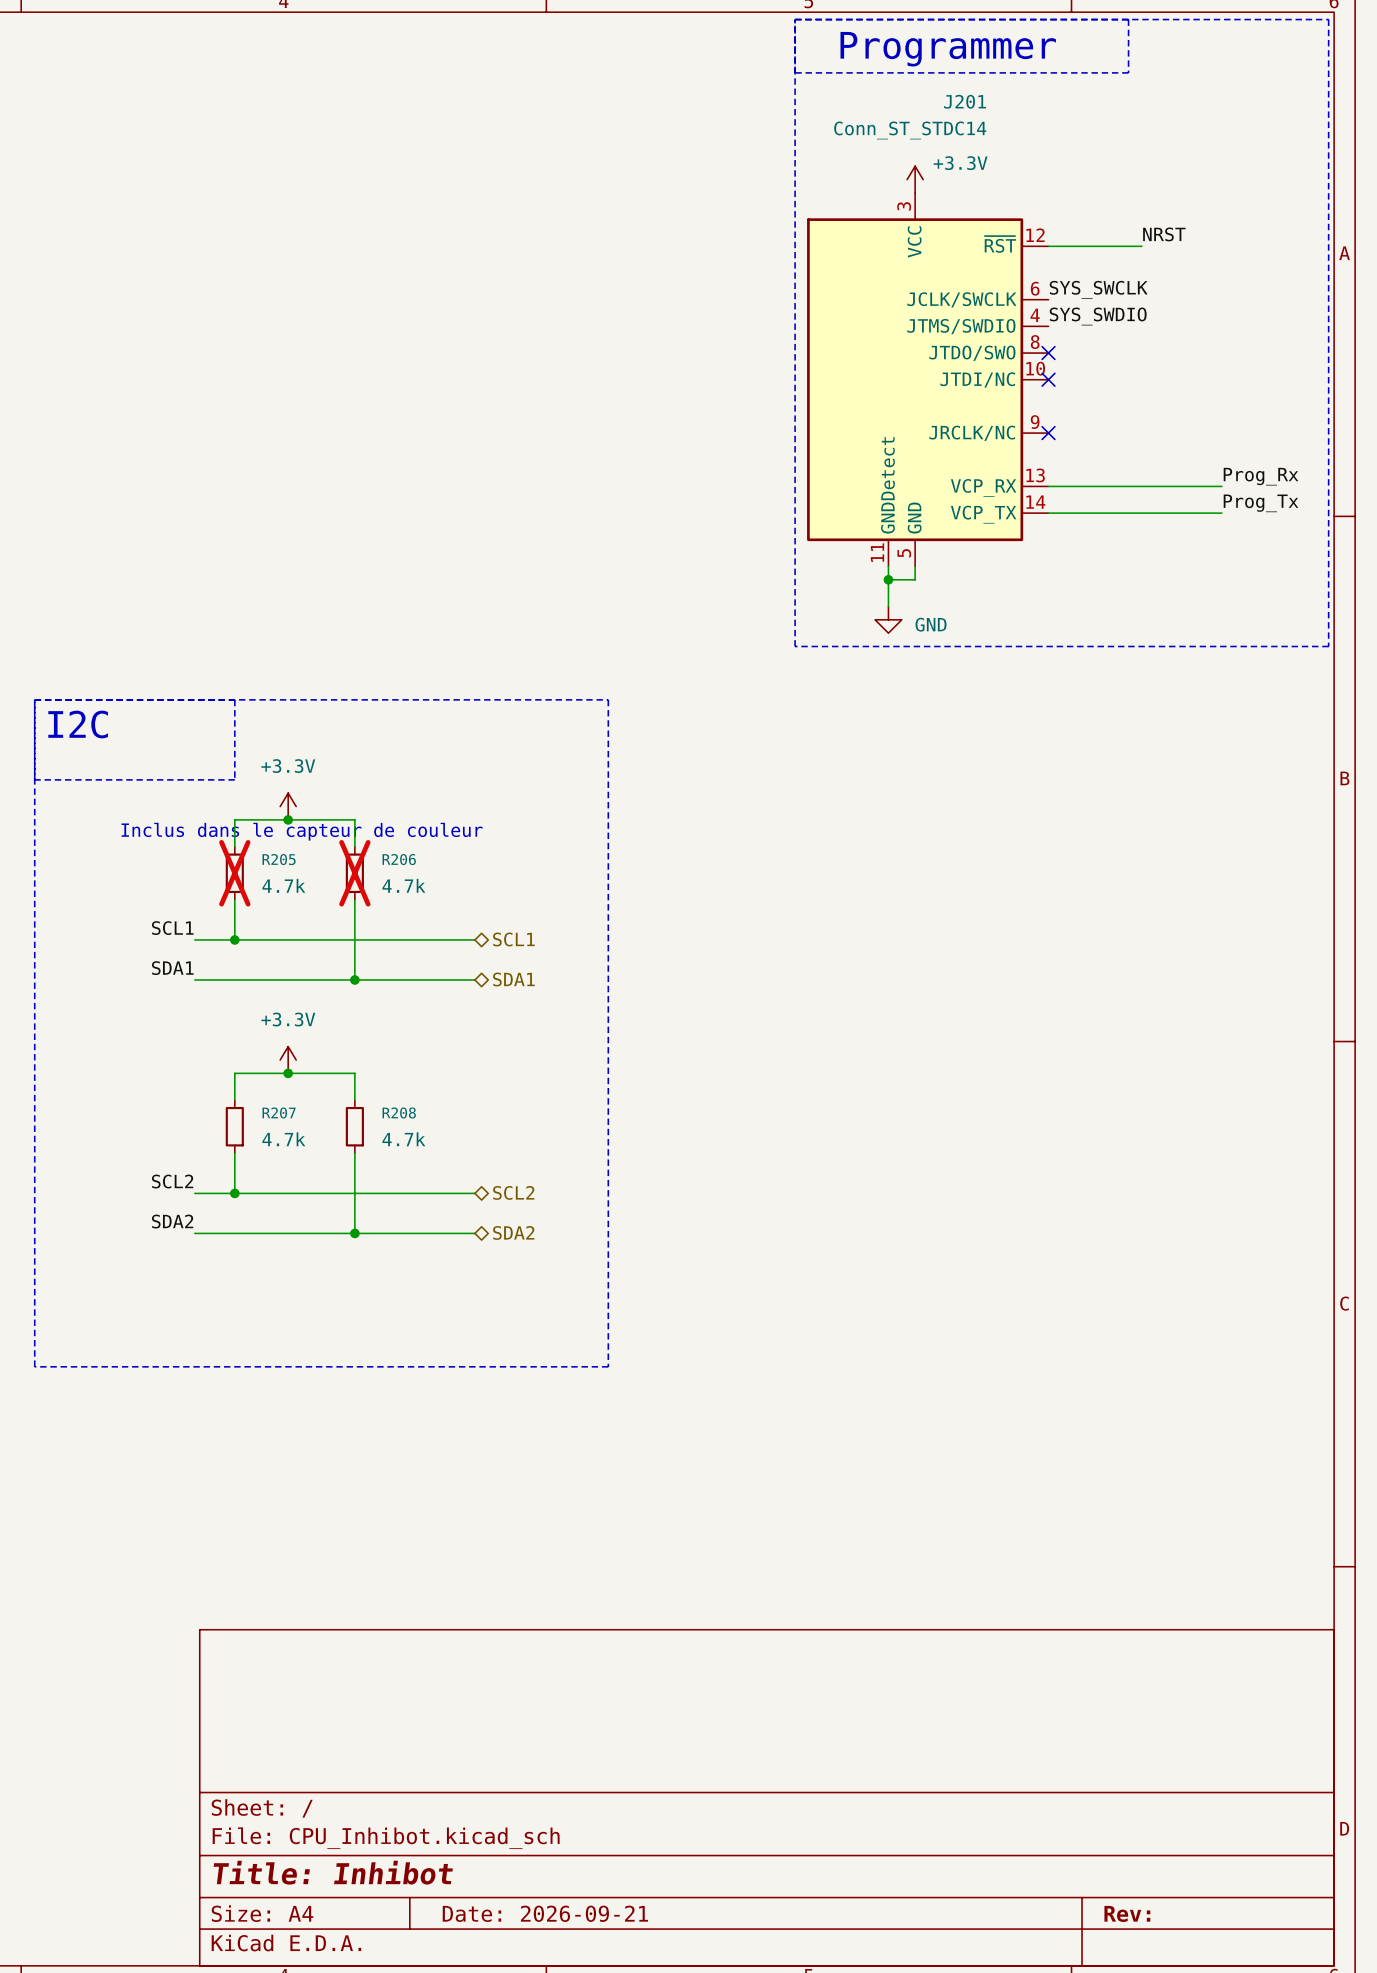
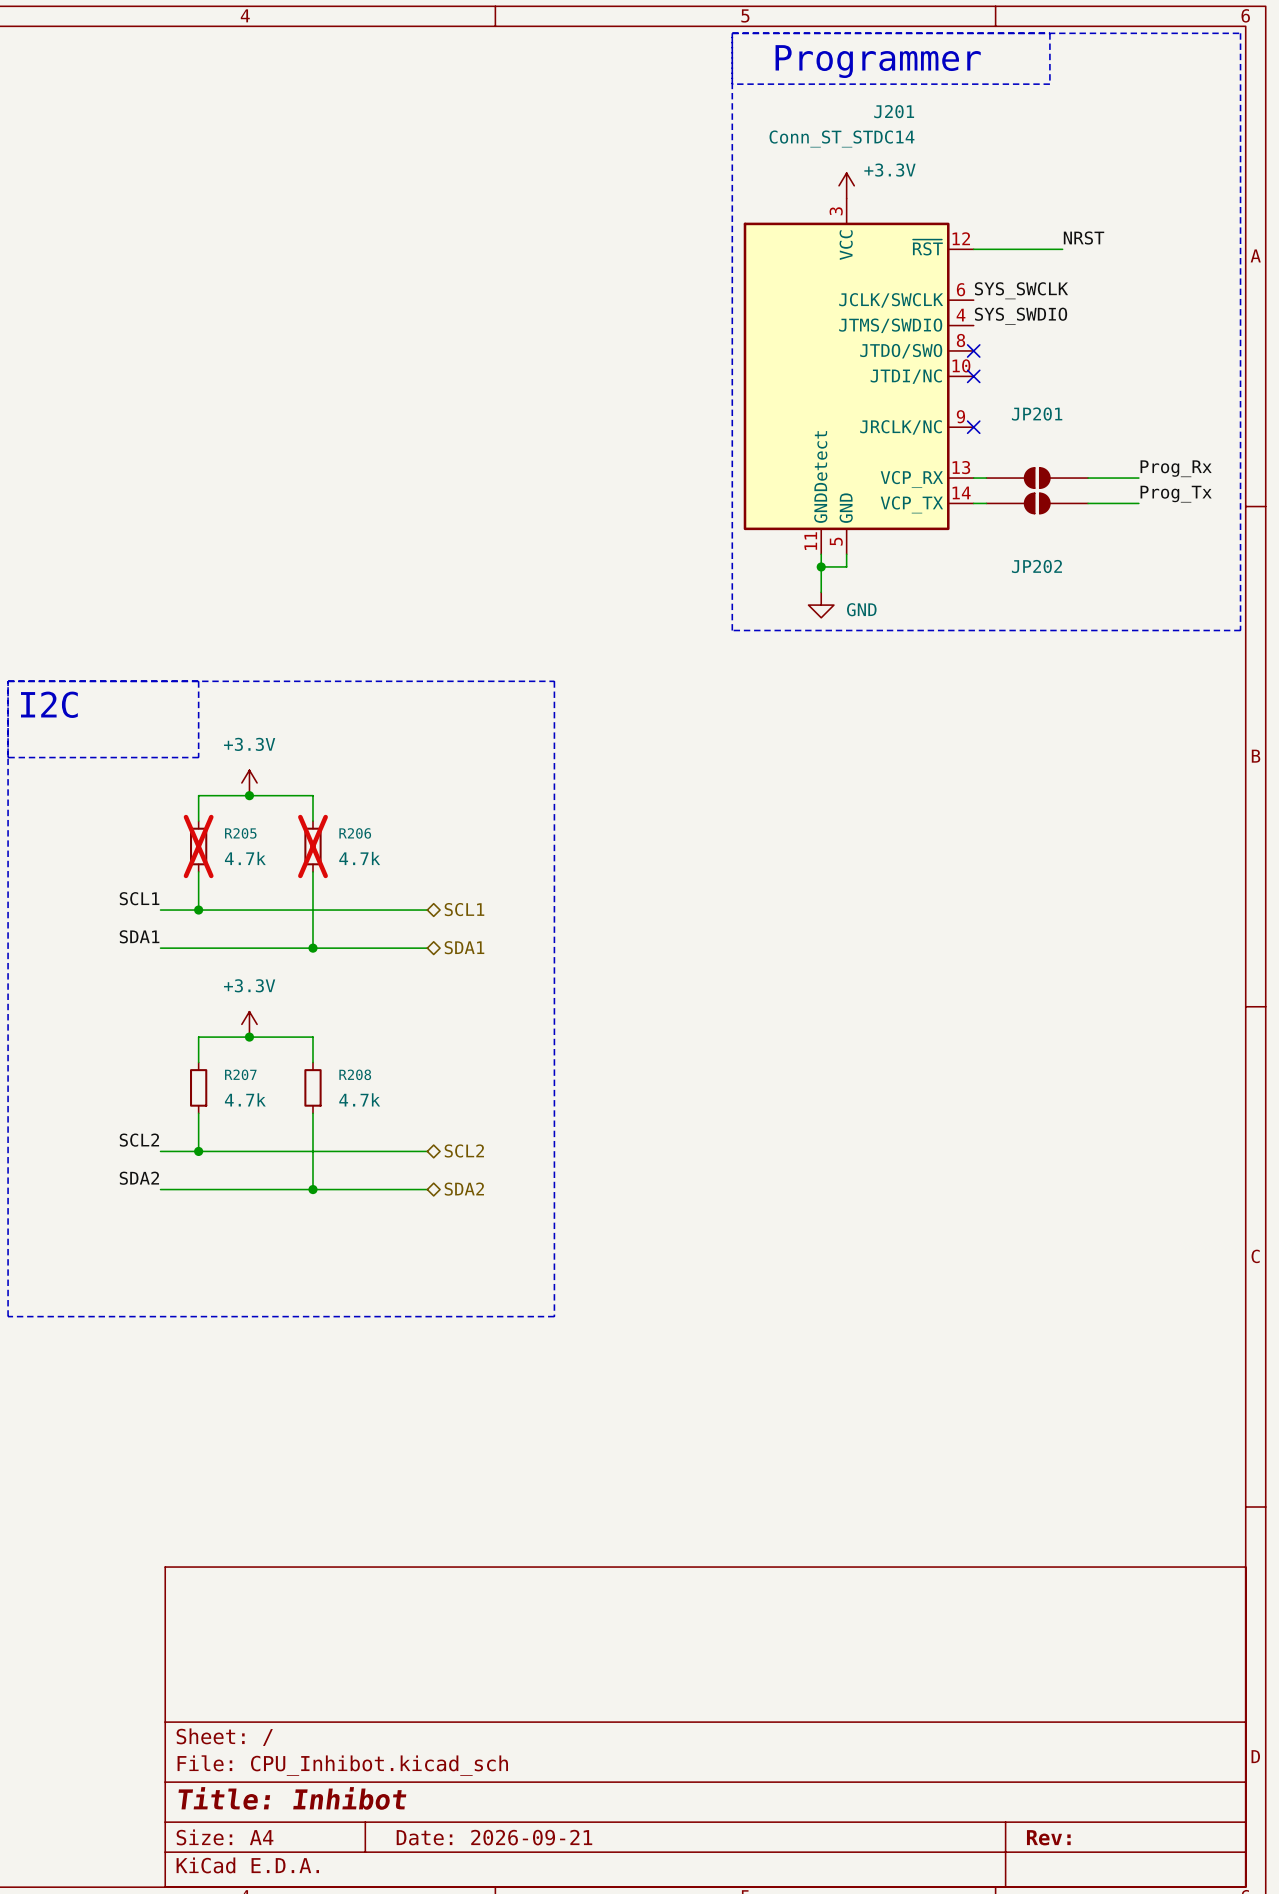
JP201: none -> (1037, 478)
JP202: none -> (1037, 503)
text: Inclus dans le capteur de couleur (302, 831) -> none

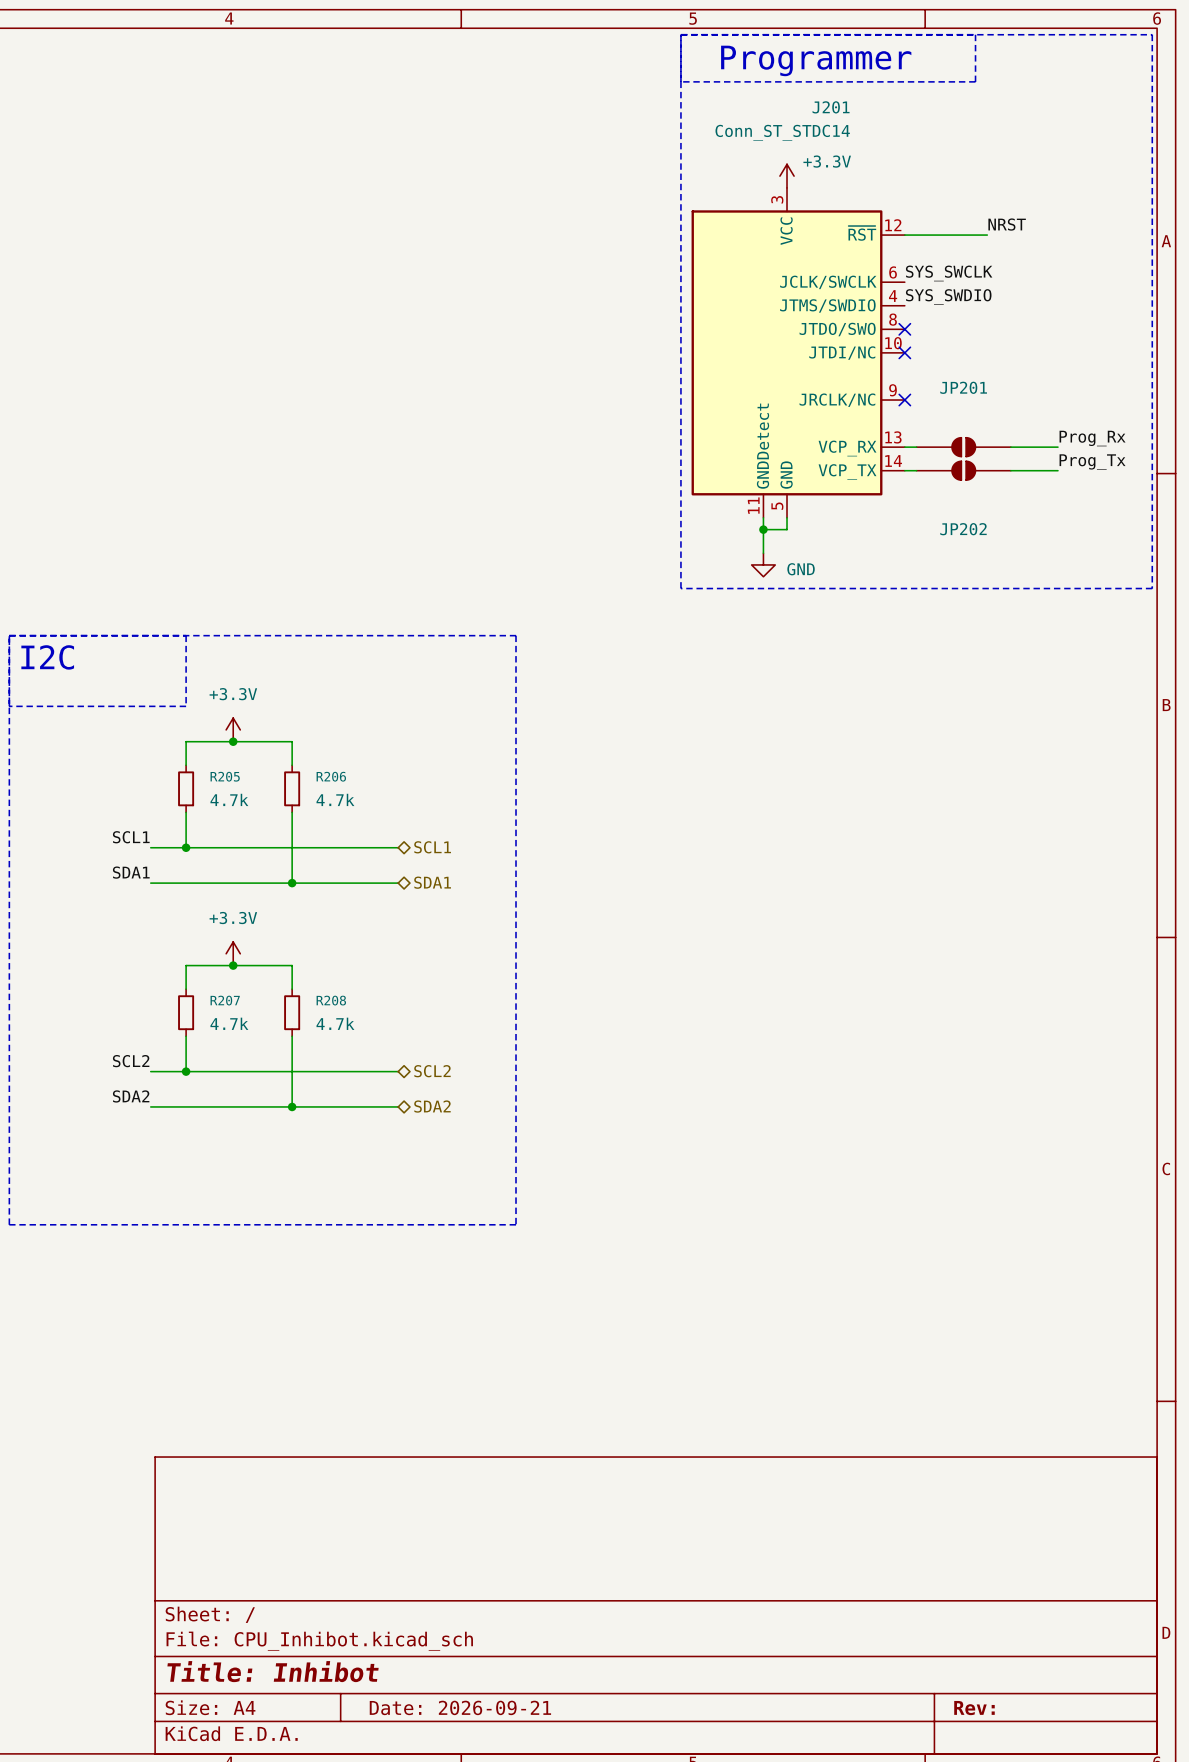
R205 do-not-place cross: (198, 846) -> none
R206 do-not-place cross: (312, 846) -> none

